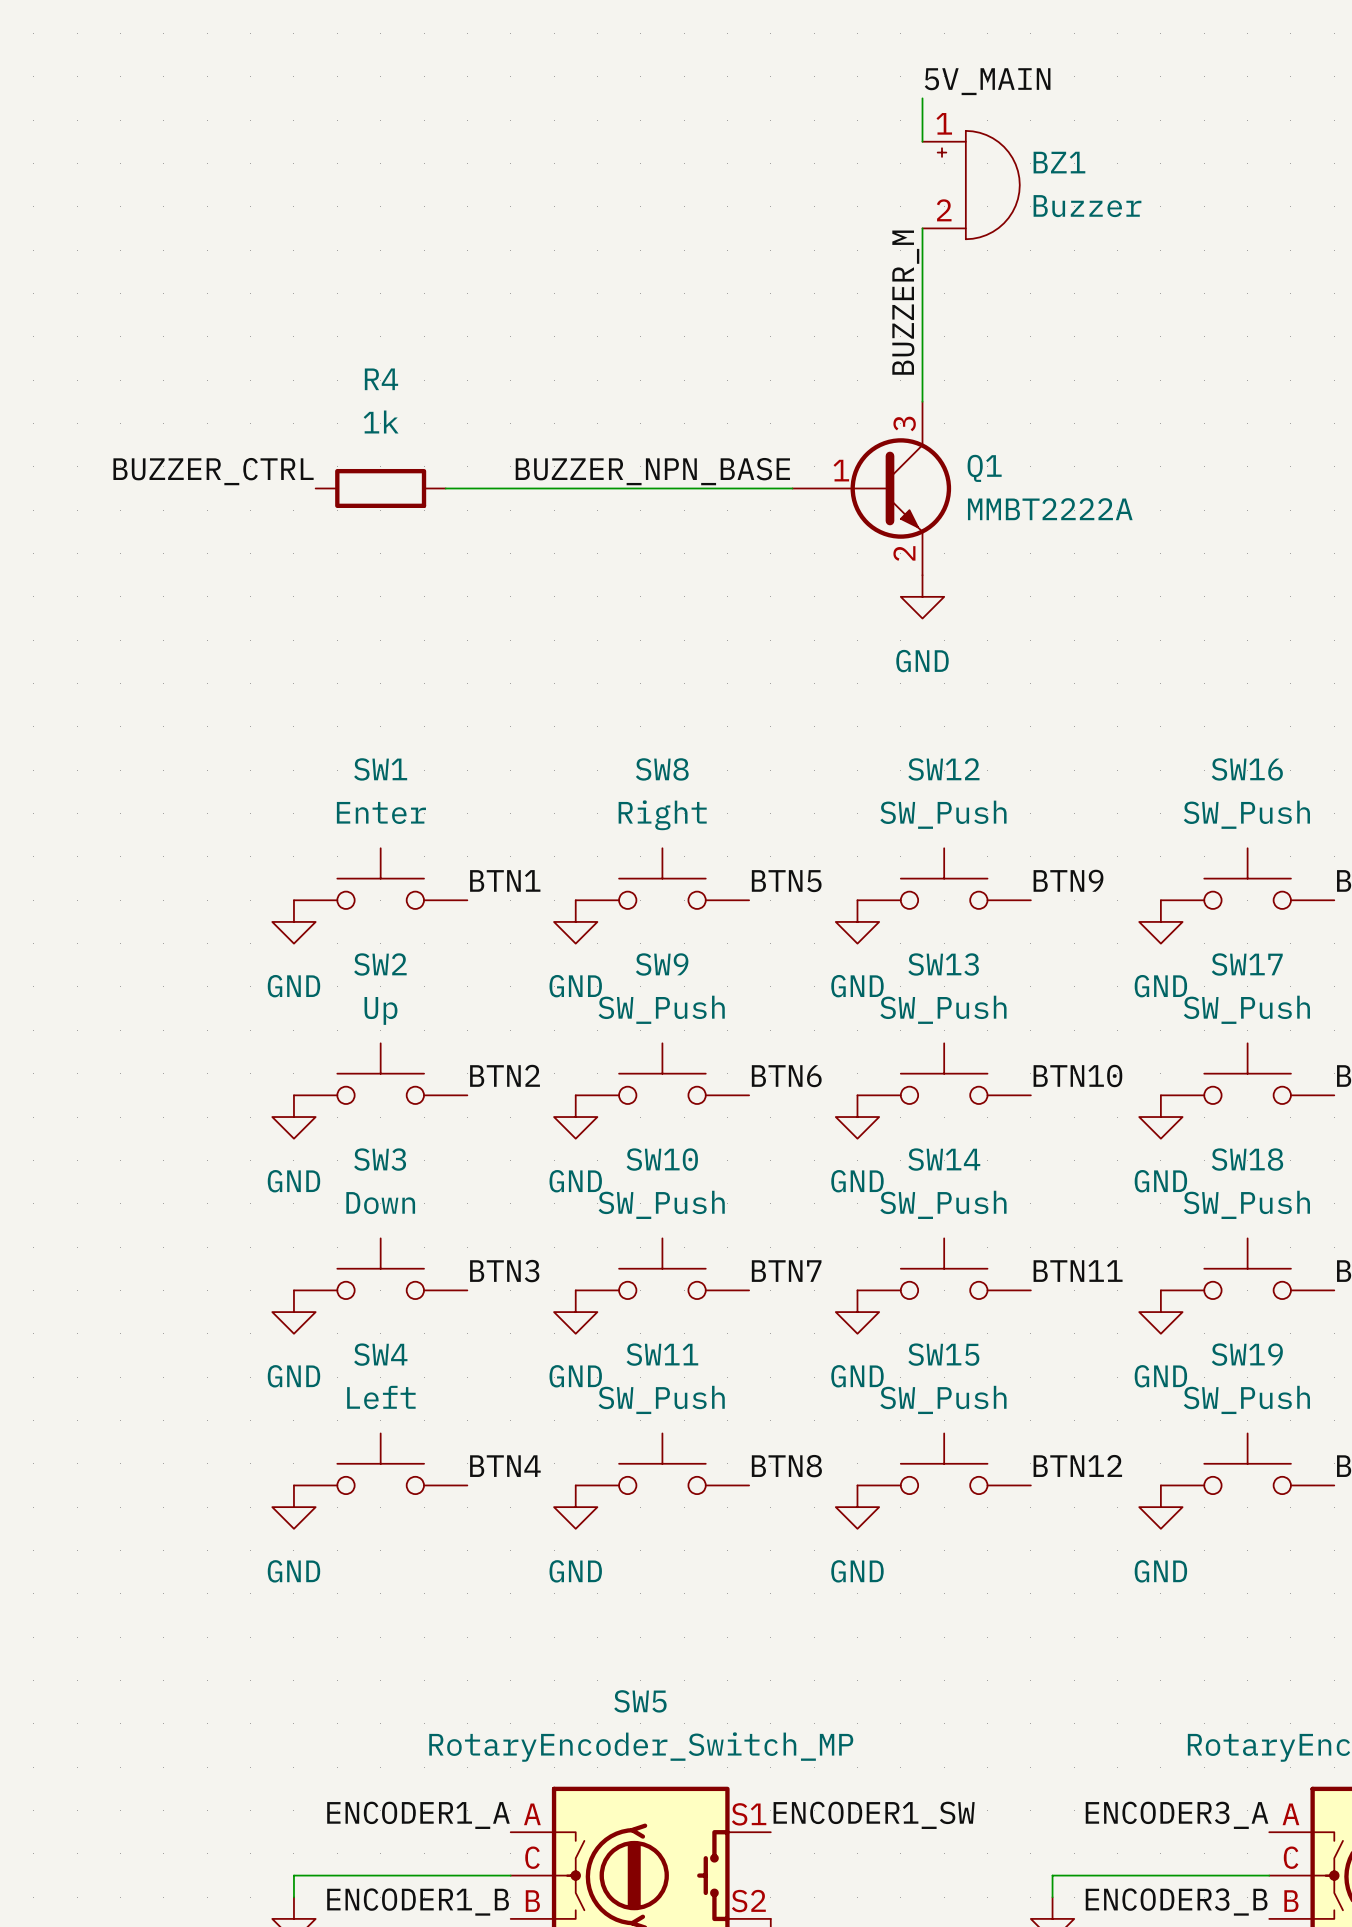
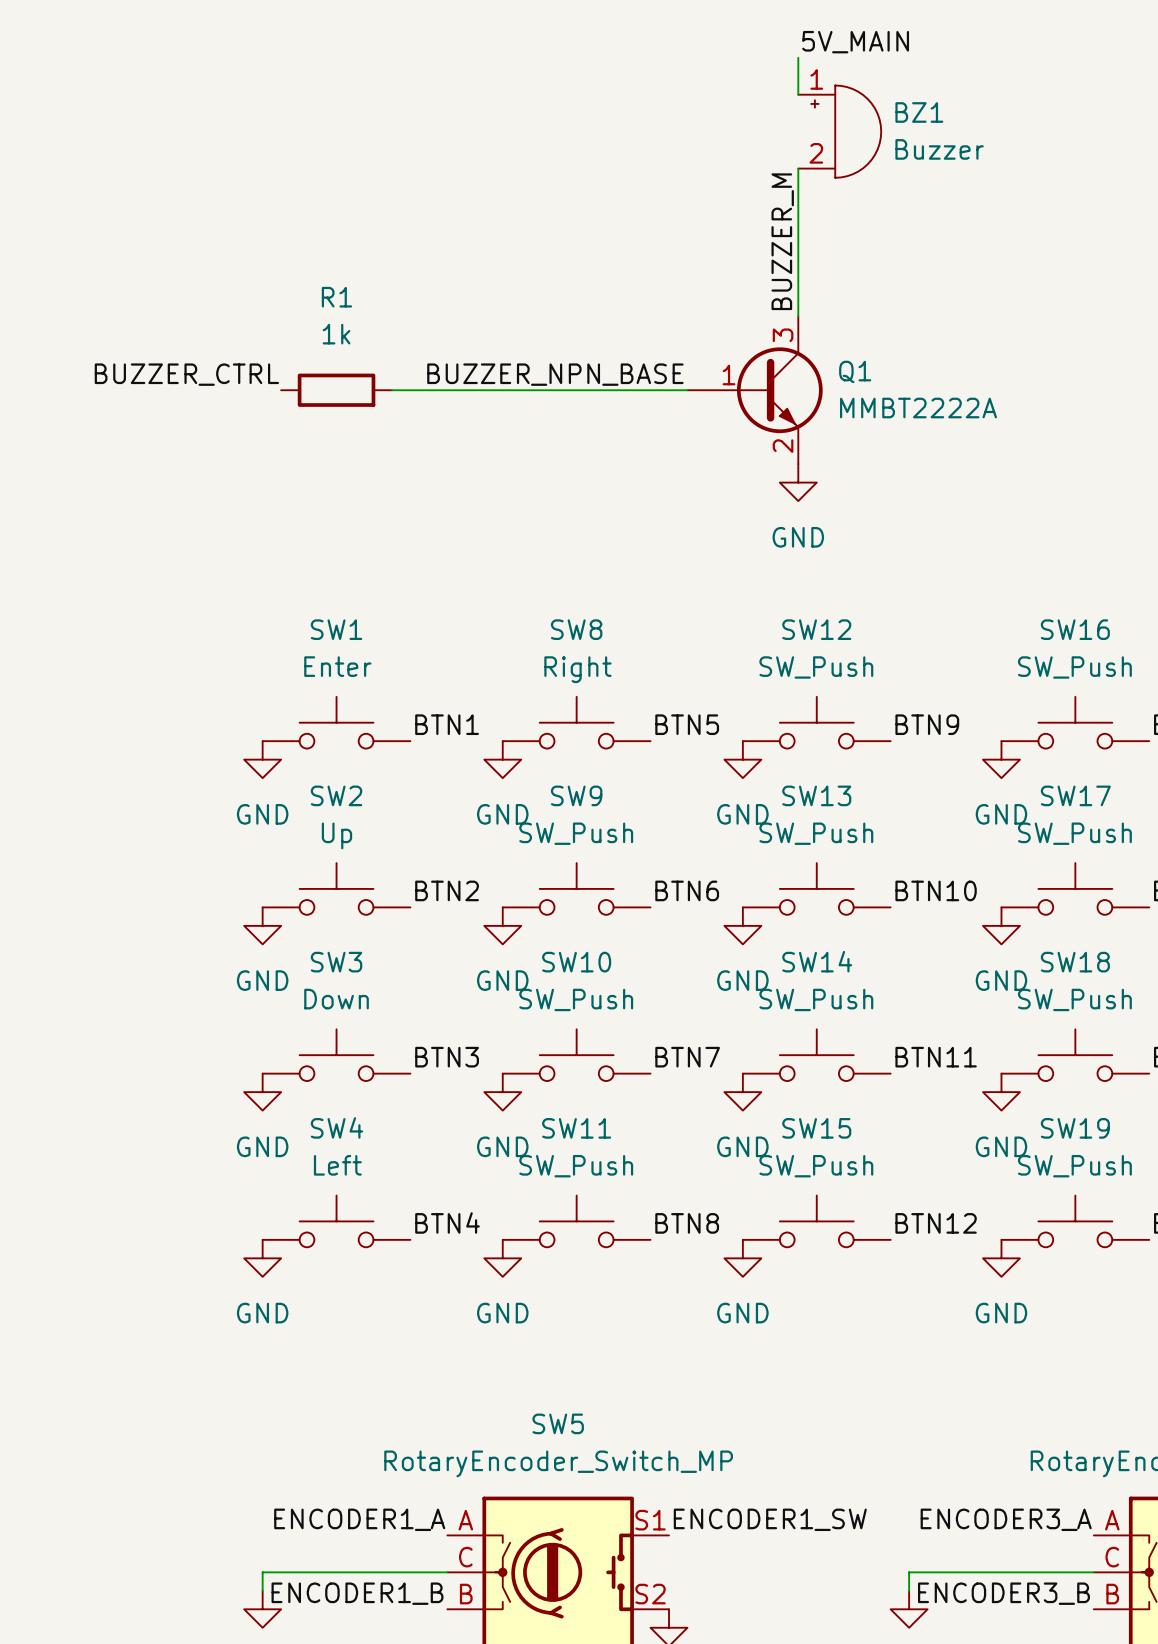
R4 name: R4 (381, 379) -> R1 (336, 297)

